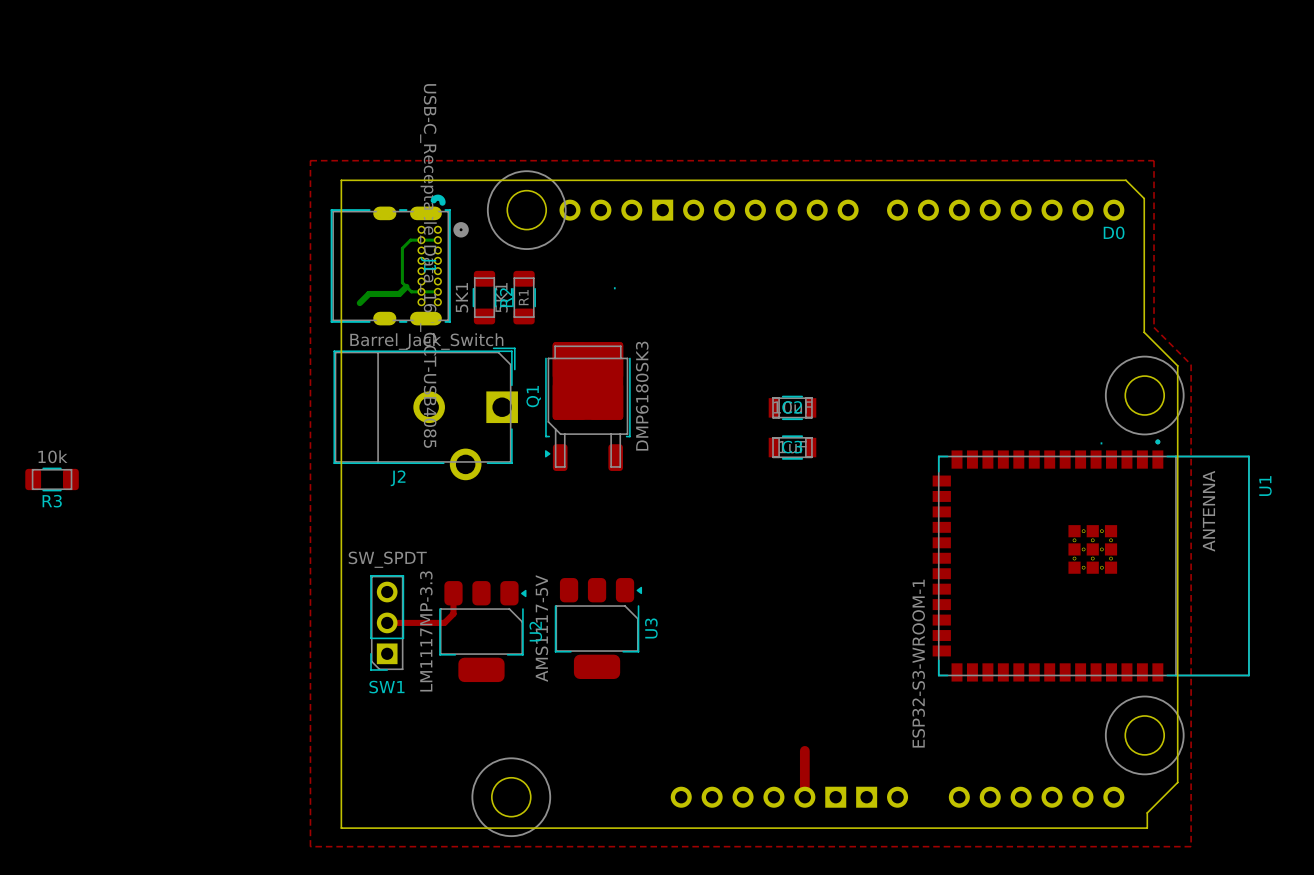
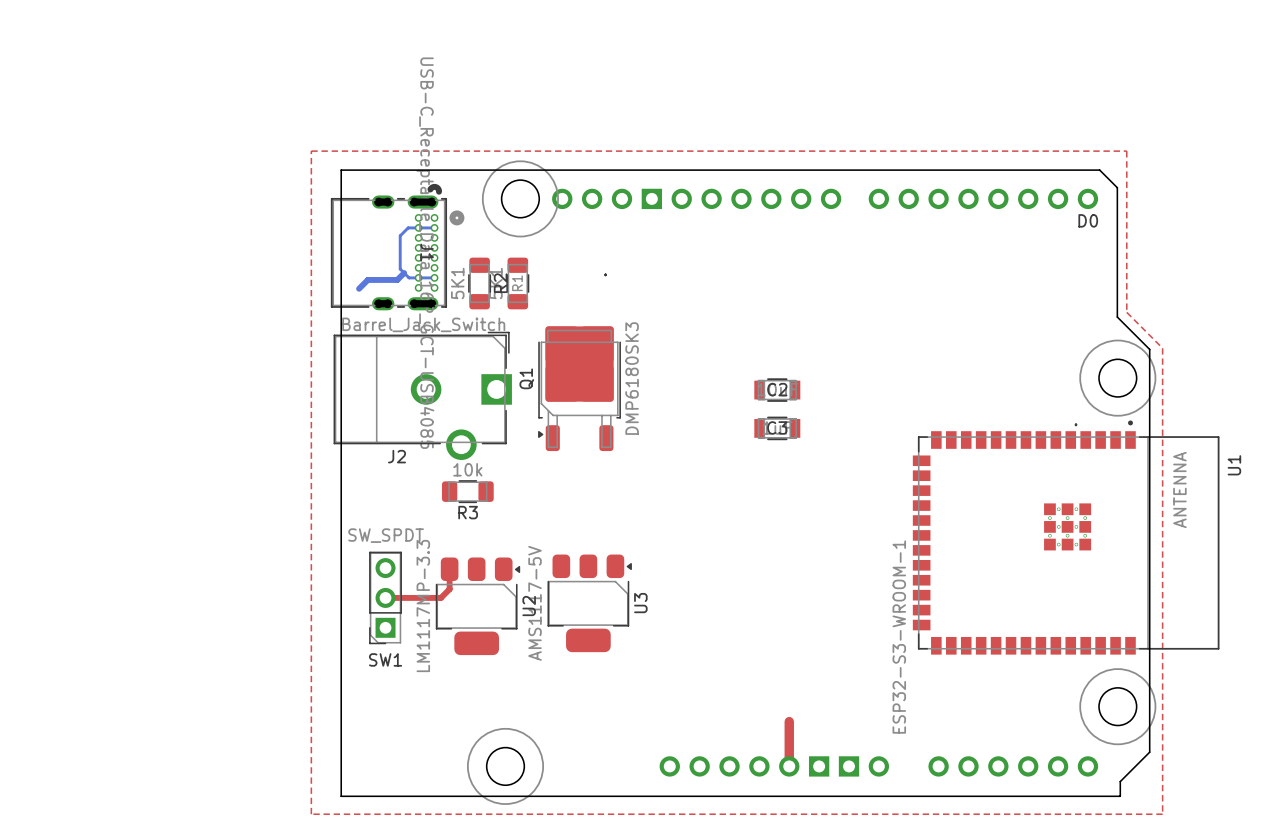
R3 position: (52, 479) -> (467, 491)

